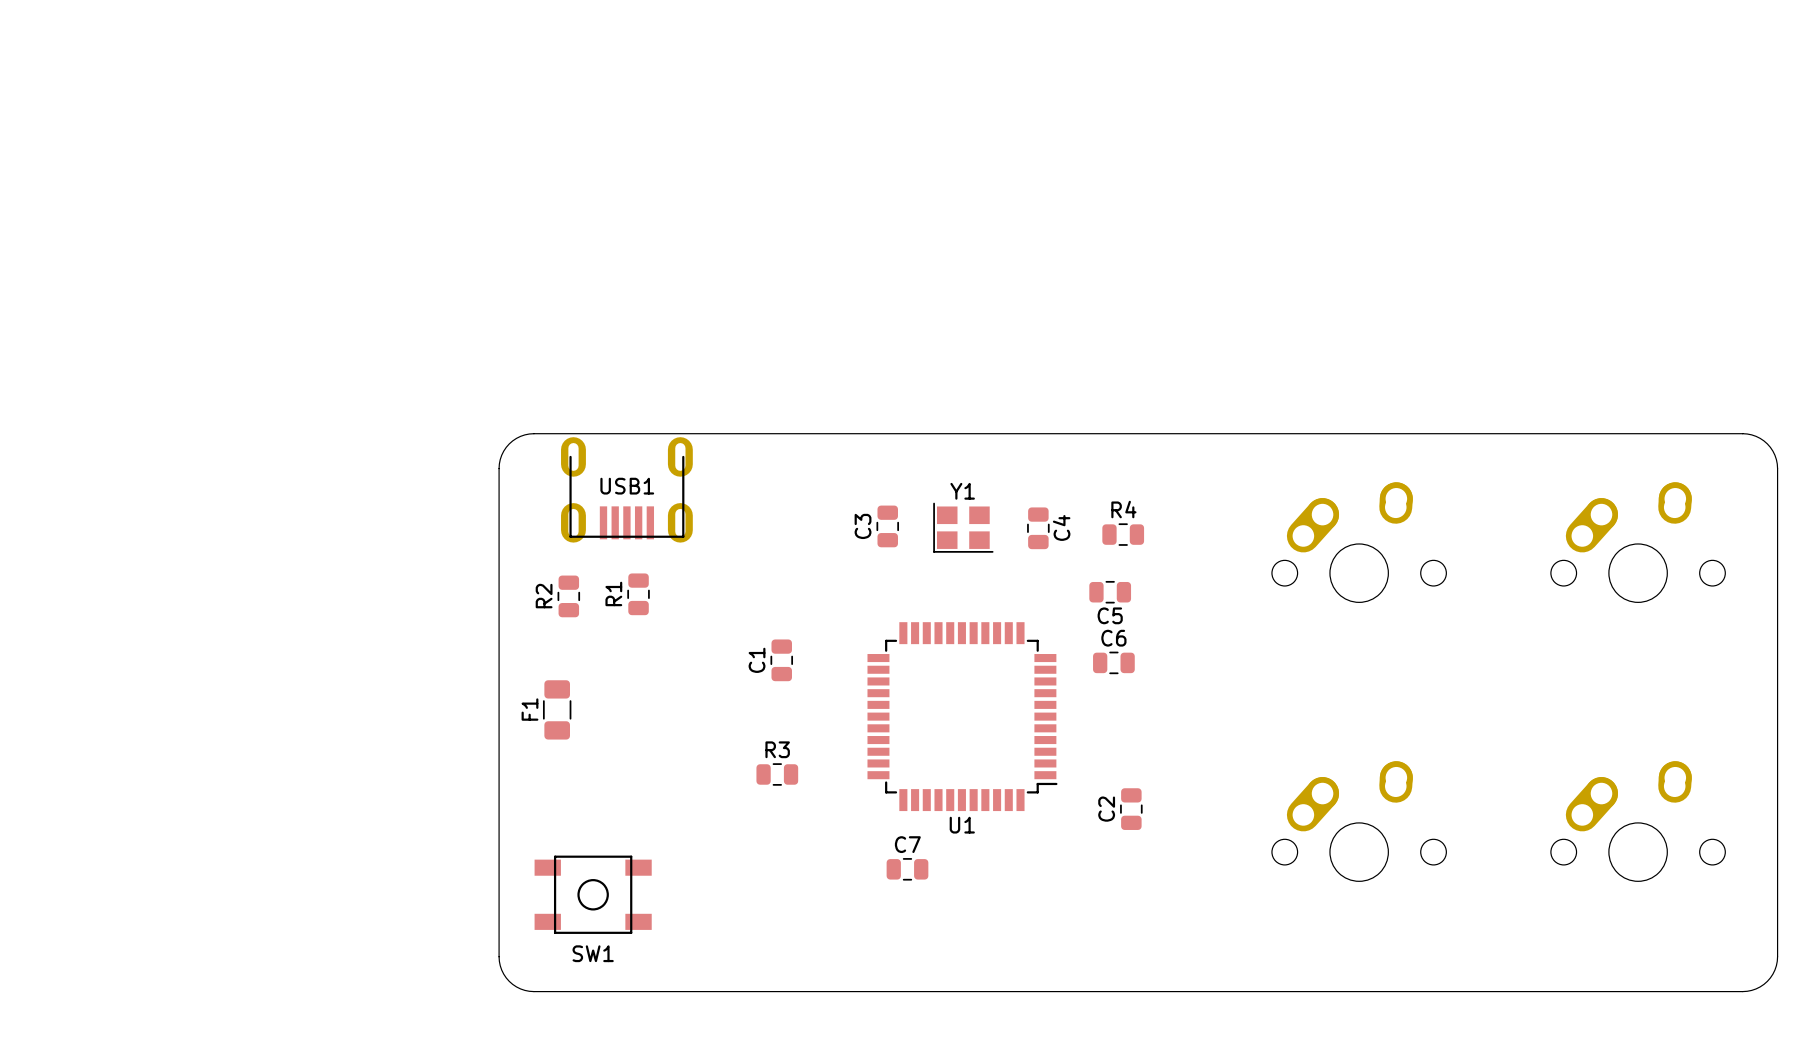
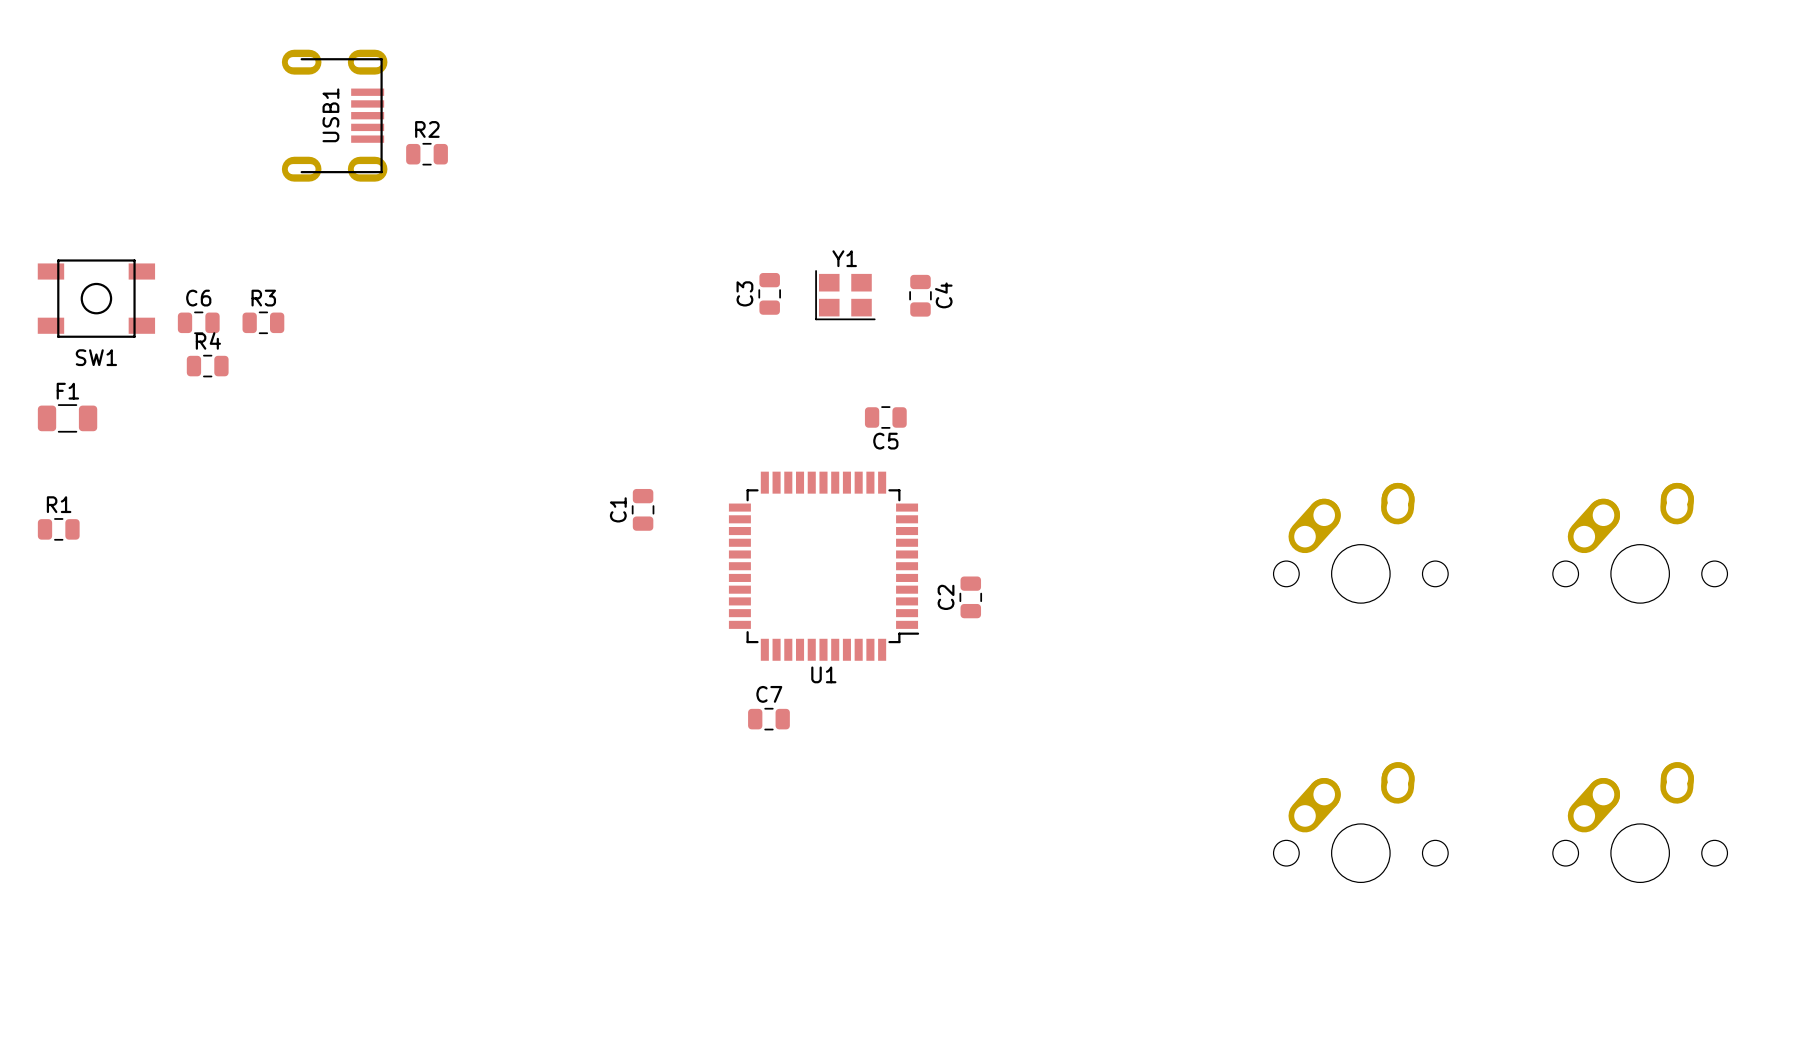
board edge: (533, 433) (1742, 433) (1756, 436) (1770, 447) (1776, 459) (1777, 468) (1777, 956) (1774, 970) (1763, 984) (1756, 988) (1742, 991) (533, 991) (520, 988) (512, 984) (503, 974) (499, 956) (499, 468) (501, 455) (509, 443) (520, 436) (533, 433) -> none
USB1 rotation: 0° (626, 489) -> 90° counterclockwise (334, 115)
USB1 position: (626, 489) -> (334, 115)
C3 position: (887, 526) -> (769, 293)
Y1 position: (963, 527) -> (845, 295)
C4 position: (1038, 528) -> (920, 295)
R4 position: (1123, 534) -> (207, 366)
C5 position: (1110, 592) -> (885, 417)
R1 rotation: 0° (638, 594) -> 90° clockwise (58, 529)
R1 position: (638, 594) -> (58, 529)
R2 rotation: 0° (568, 596) -> 90° clockwise (427, 154)
R2 position: (568, 596) -> (427, 154)
C1 position: (781, 660) -> (643, 509)
C6 position: (1113, 662) -> (198, 322)
F1 rotation: 0° (557, 709) -> 90° clockwise (67, 418)
F1 position: (557, 709) -> (67, 418)
U1 position: (962, 716) -> (824, 566)
R3 position: (777, 774) -> (263, 322)
C2 position: (1131, 809) -> (970, 597)
C7 position: (907, 869) -> (768, 719)
SW1 position: (593, 894) -> (96, 298)

